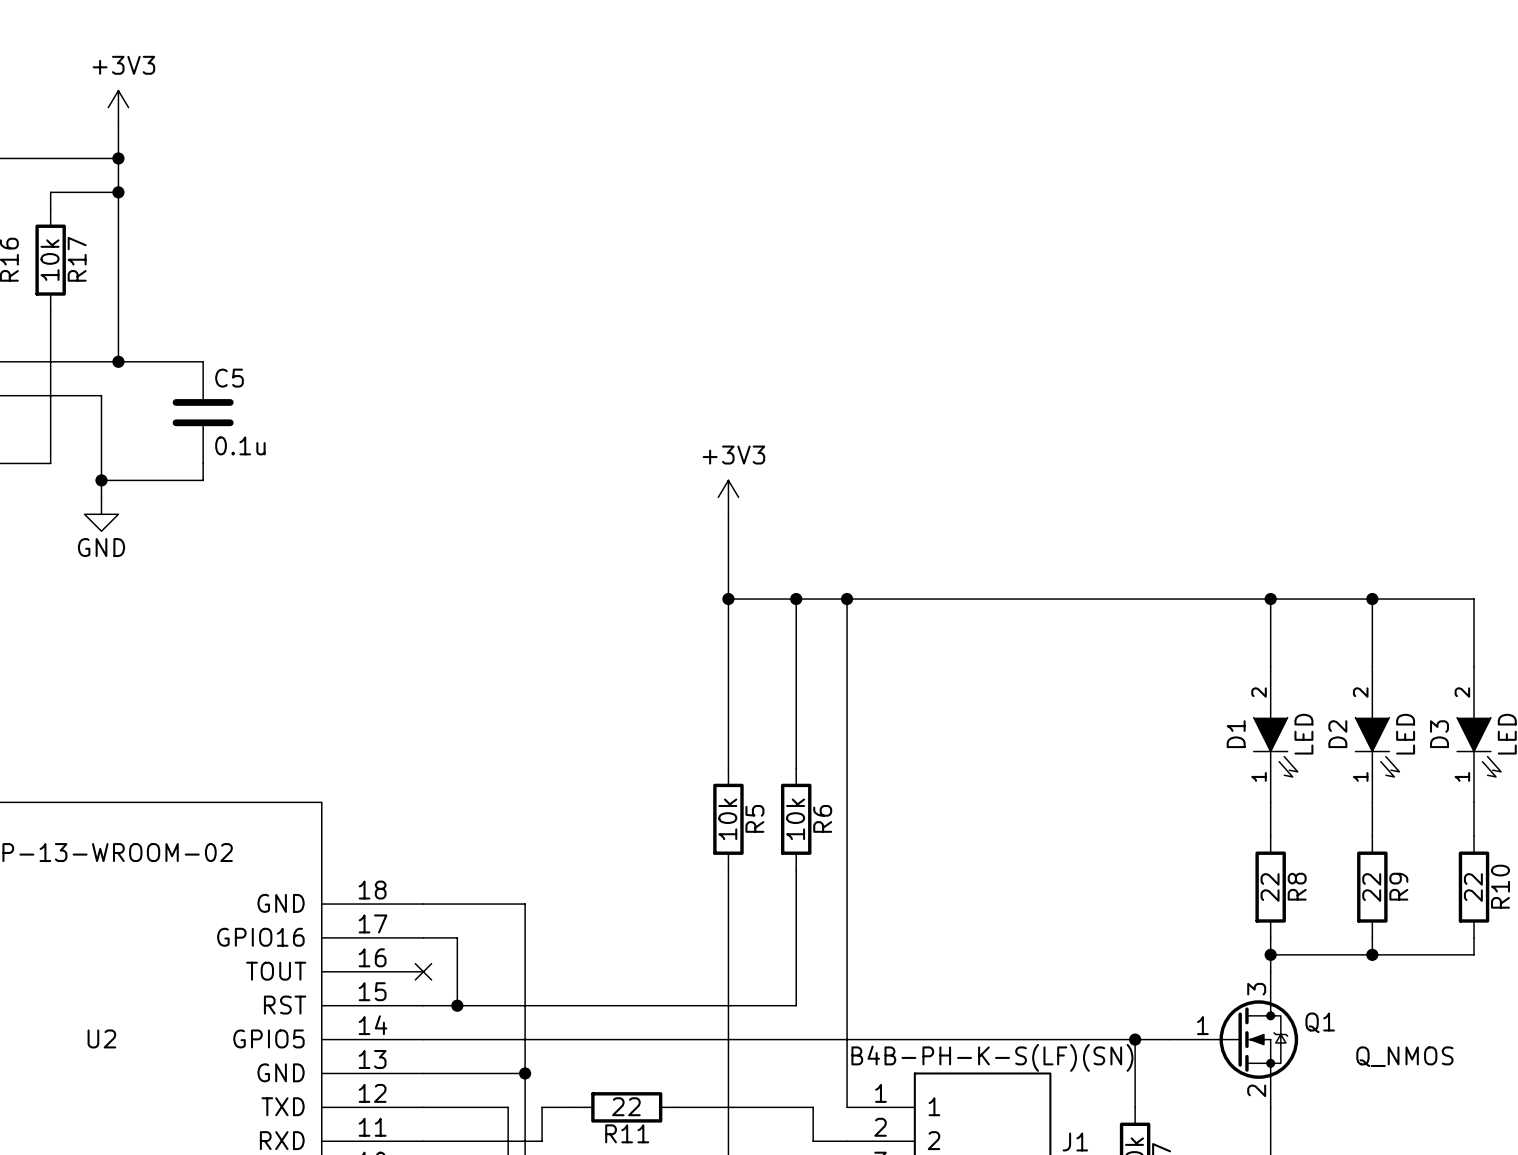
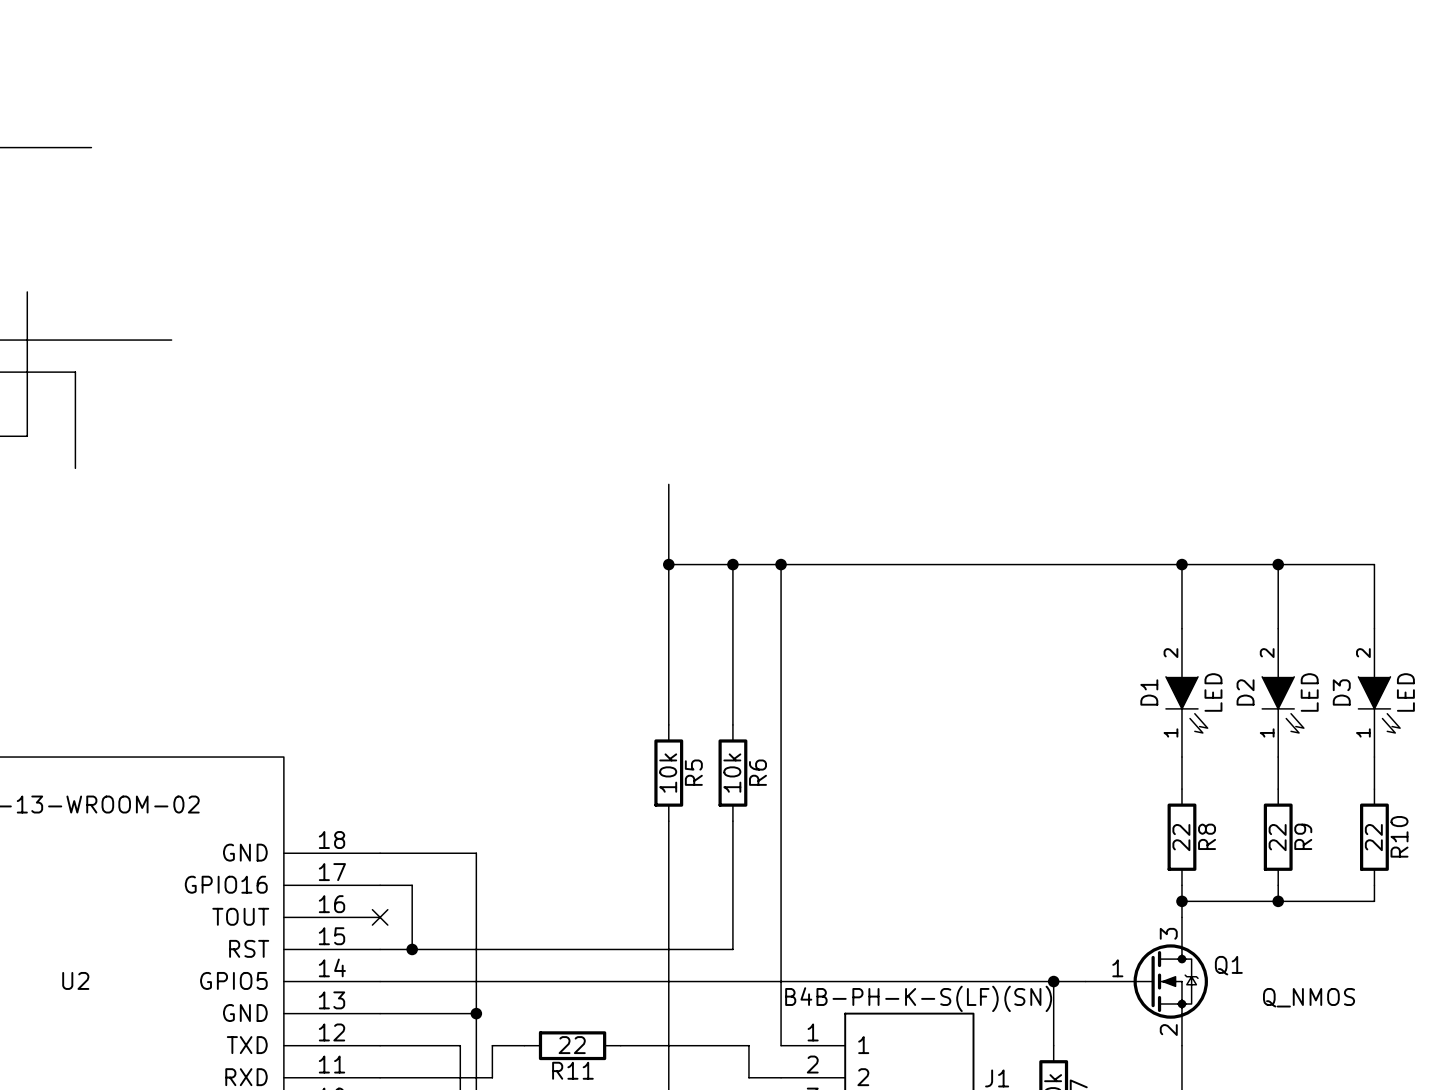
power symbol: +3V3 (118, 107) -> none
wire: (118, 124) (118, 361) -> none
junction: (118, 158) -> none
wire: (118, 192) (50, 192) (50, 209) -> none
junction: (118, 192) -> none
R17: 10k (50, 260) -> none
junction: (118, 361) -> none
C5: 0.1u (203, 412) -> none
wire: (203, 463) (203, 480) (101, 480) -> none
junction: (101, 480) -> none
power symbol: +3V3 (728, 497) -> none
power symbol: GND (101, 514) -> none

